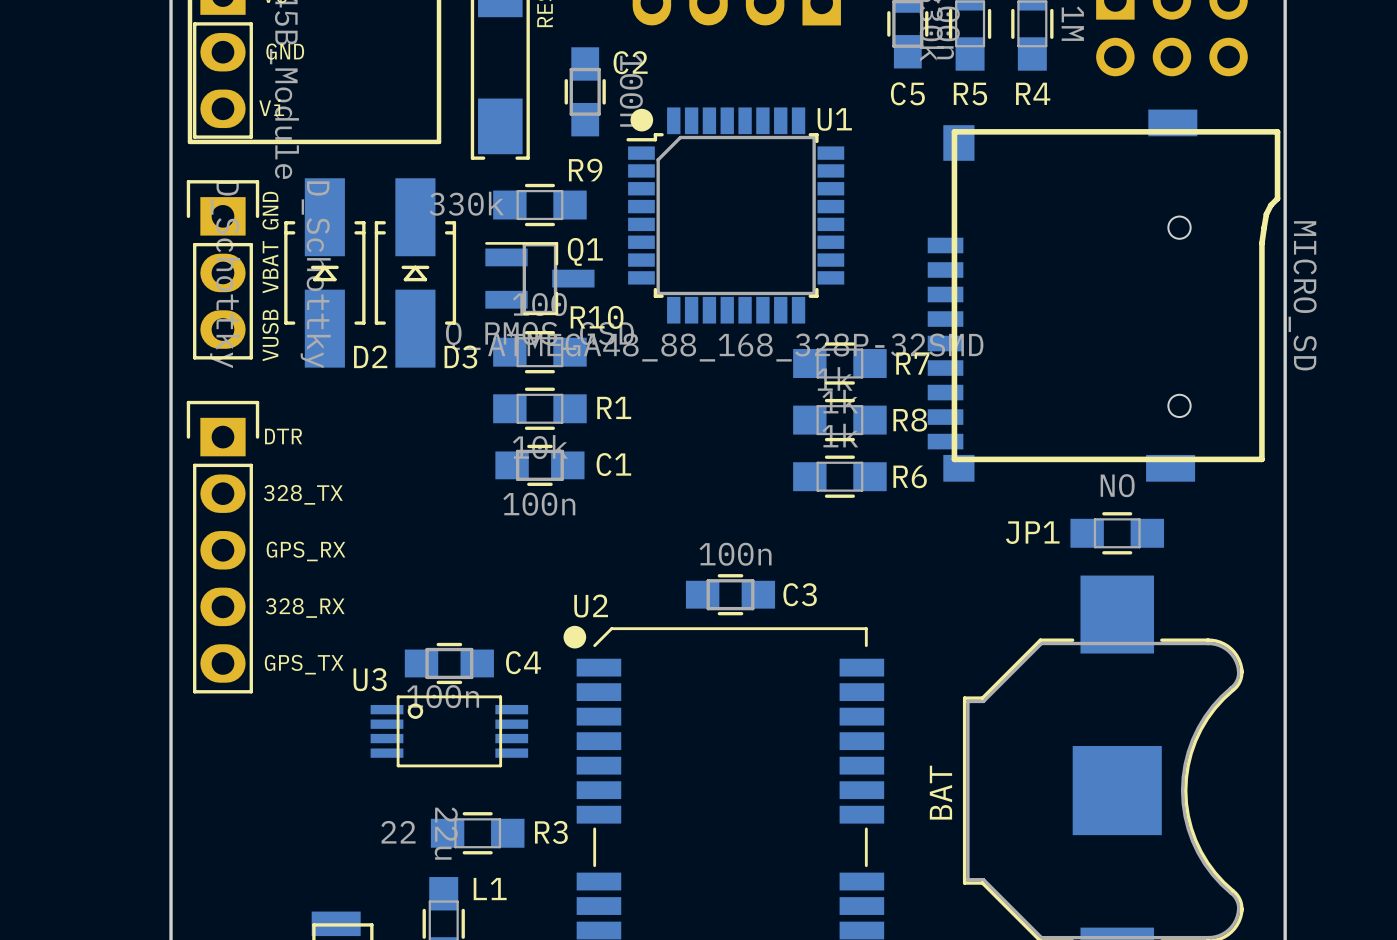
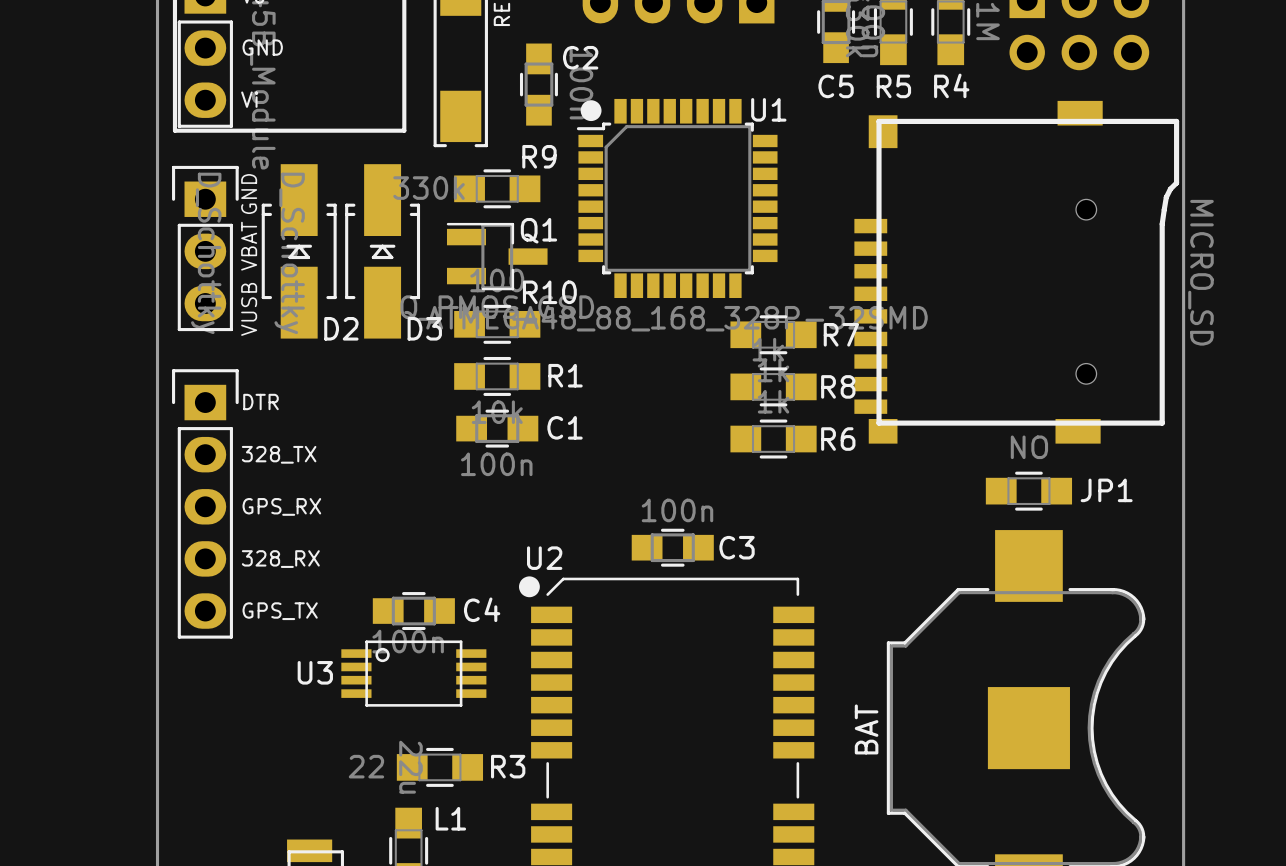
JP1 name position: JP1 (1032, 532) -> JP1 (1106, 490)
U3 name position: U3 (370, 679) -> U3 (315, 672)

